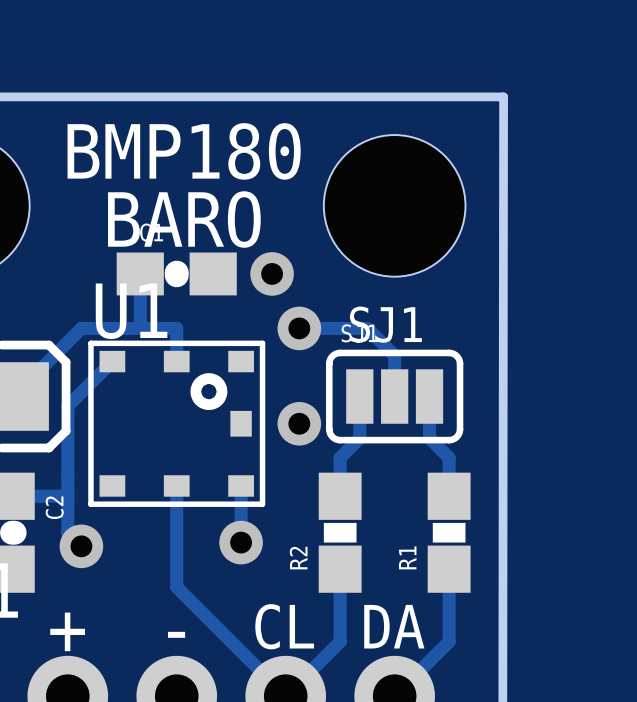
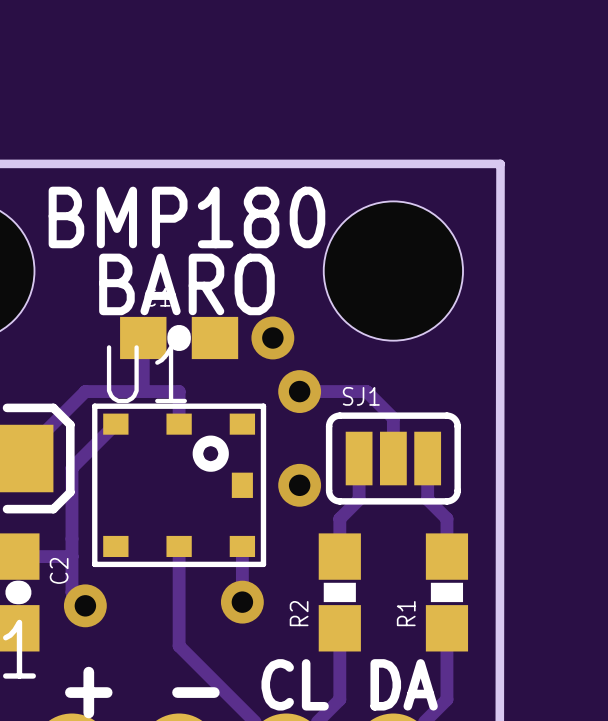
text: SJ1 (385, 324) -> none

